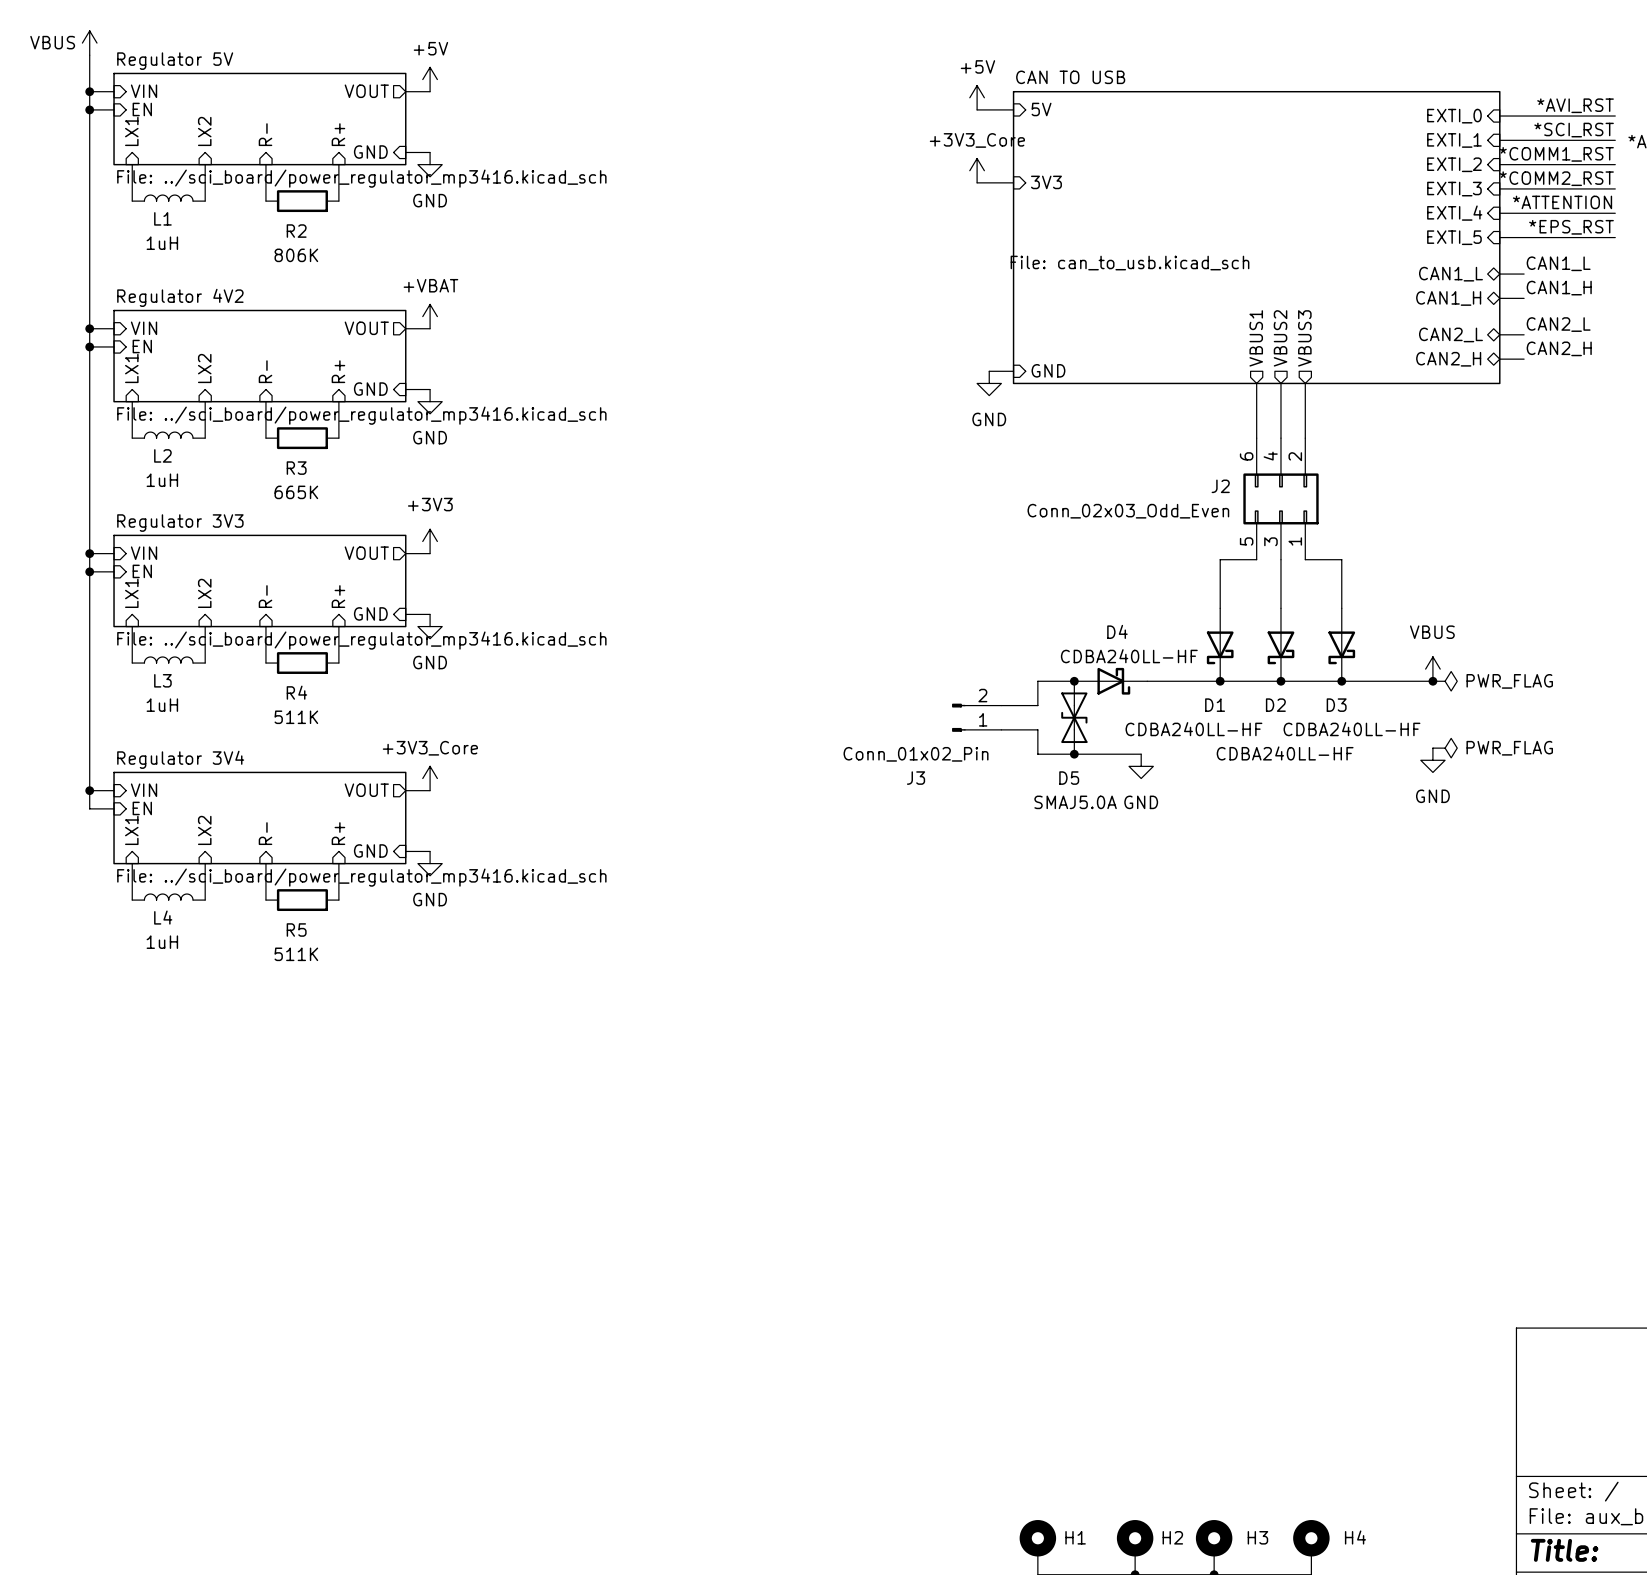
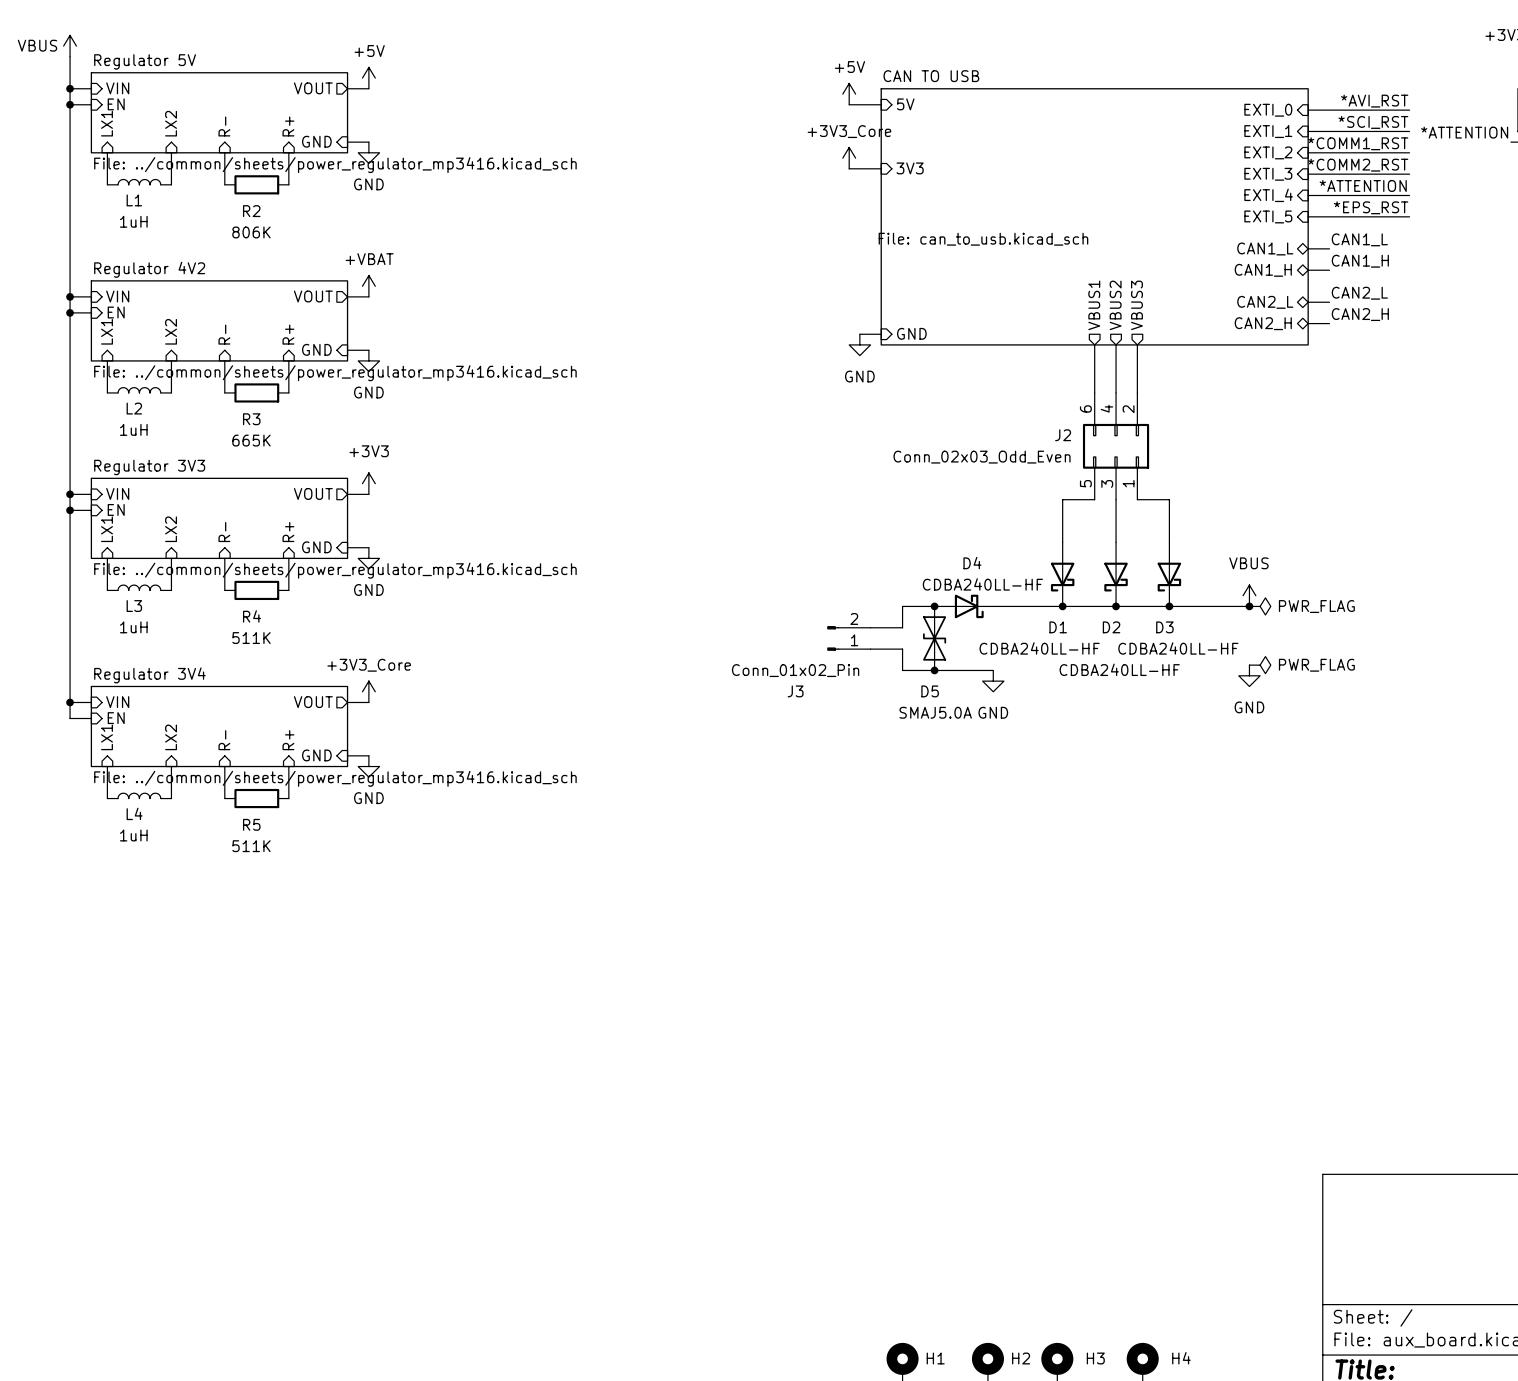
sheet Regulator 5V value: File: ../sci_board/power_regulator_mp3416.kicad_sch (361, 178) -> File: ../common/sheets/power_regulator_mp3416.kicad_sch (335, 165)
sheet Regulator 4V2 value: File: ../sci_board/power_regulator_mp3416.kicad_sch (361, 415) -> File: ../common/sheets/power_regulator_mp3416.kicad_sch (335, 373)
sheet Regulator 3V3 value: File: ../sci_board/power_regulator_mp3416.kicad_sch (361, 640) -> File: ../common/sheets/power_regulator_mp3416.kicad_sch (335, 570)
sheet Regulator 3V4 value: File: ../sci_board/power_regulator_mp3416.kicad_sch (361, 877) -> File: ../common/sheets/power_regulator_mp3416.kicad_sch (335, 778)

